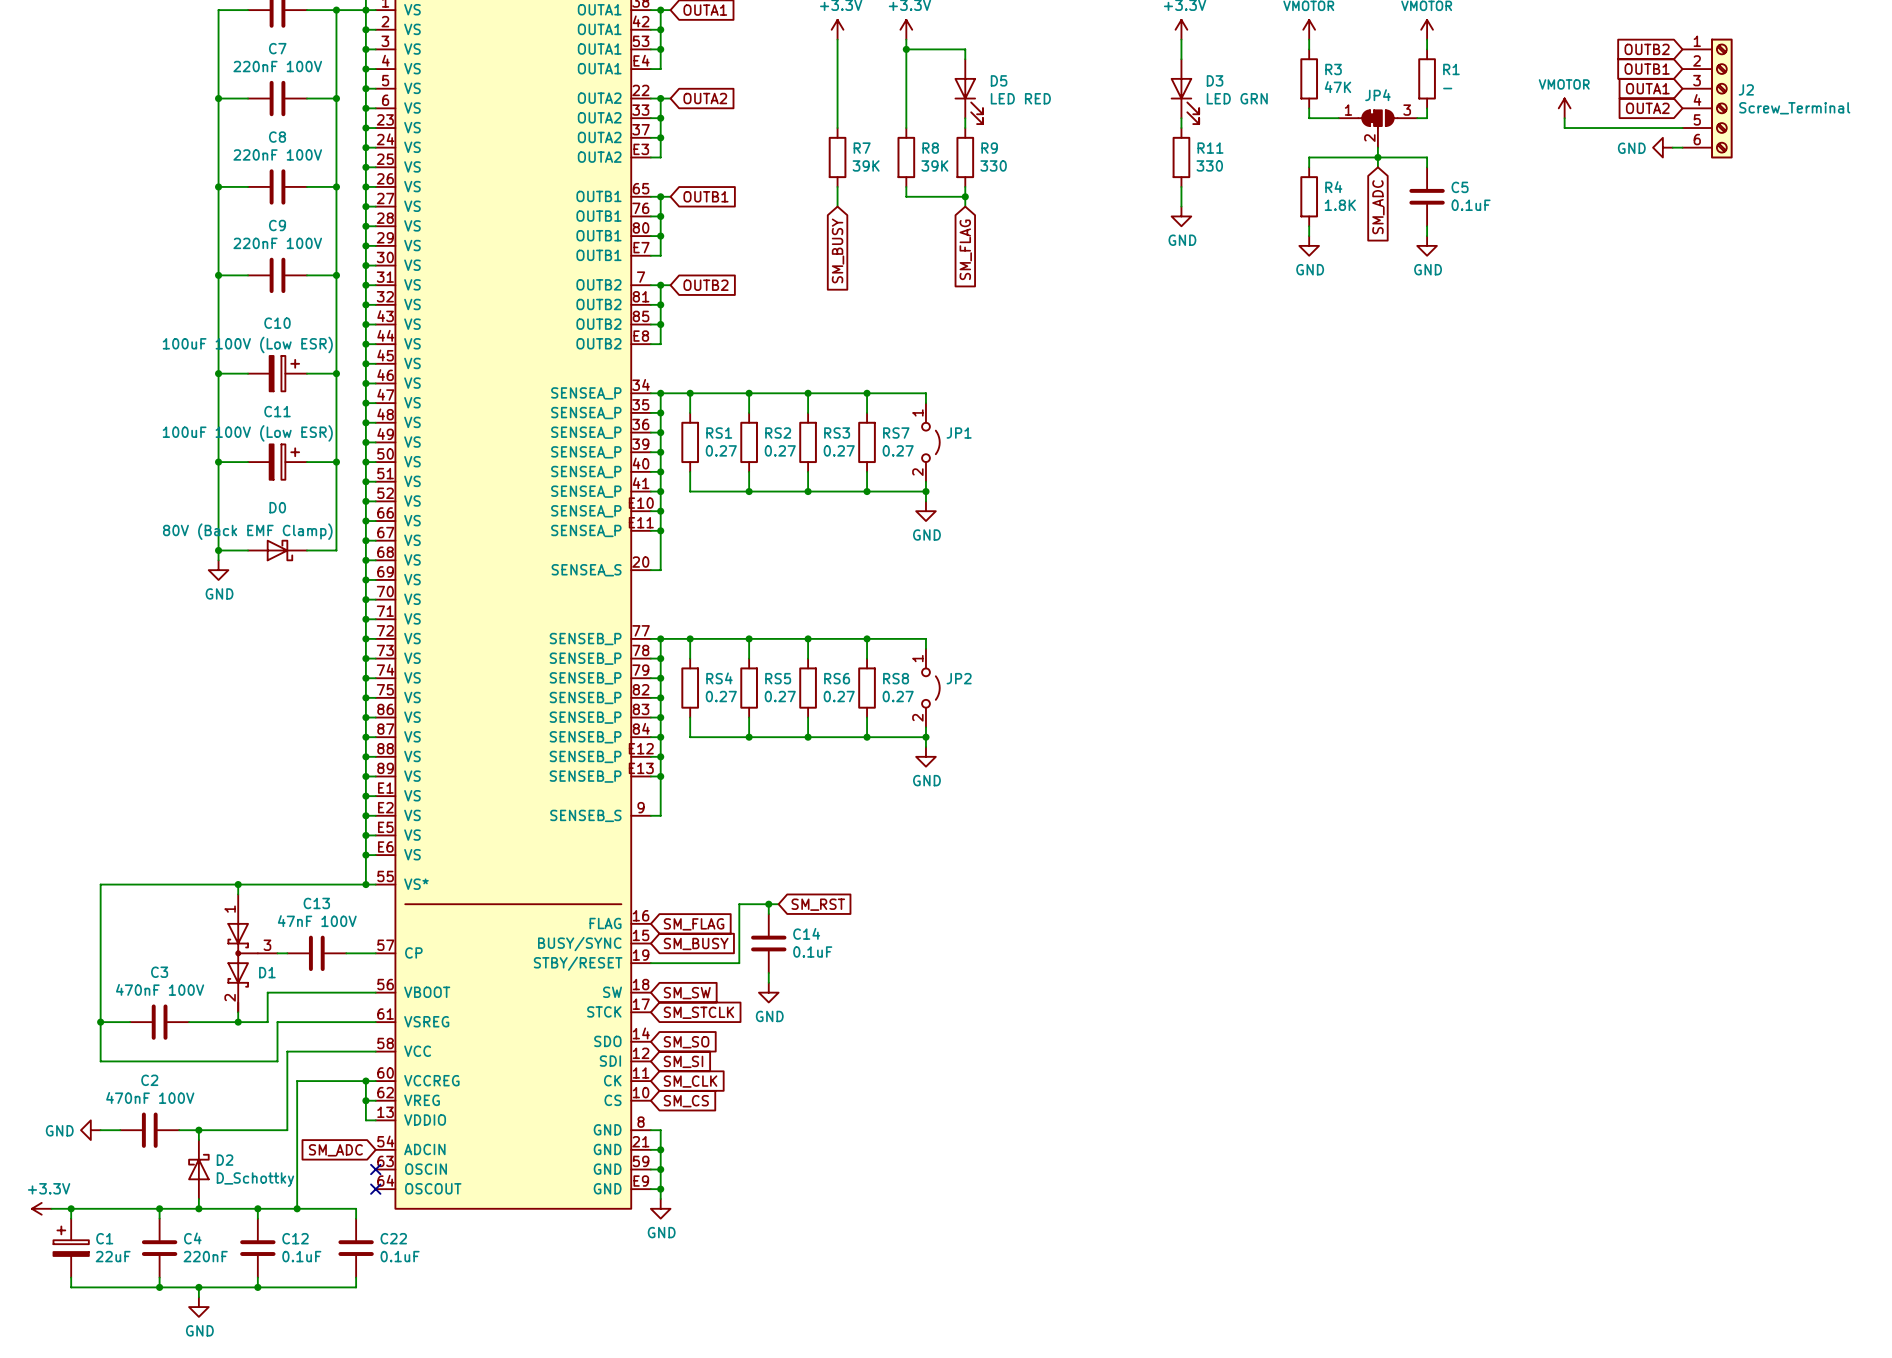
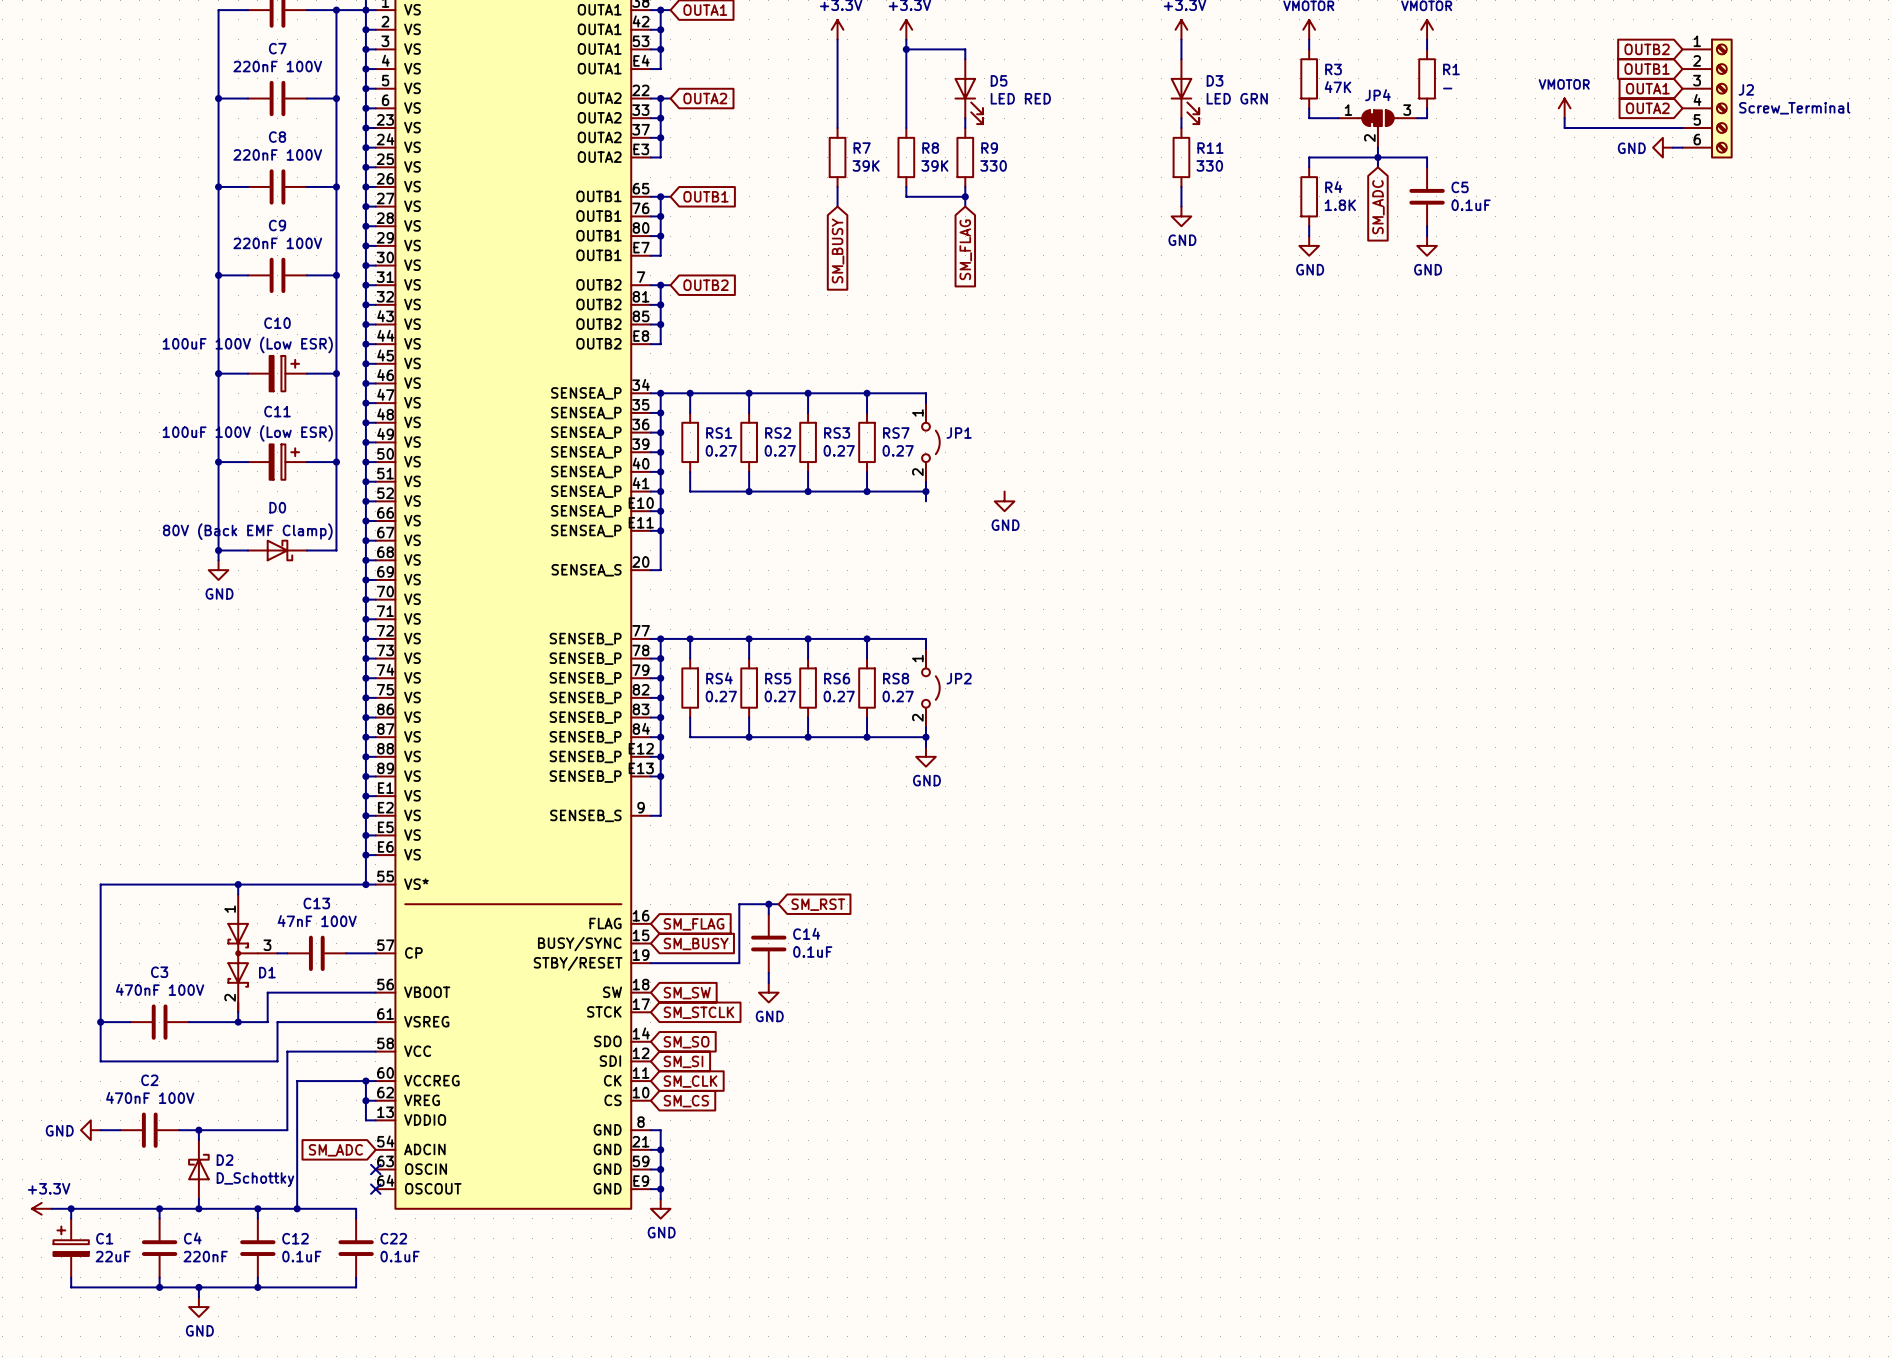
power symbol position: GND (925, 511) -> GND (1004, 501)

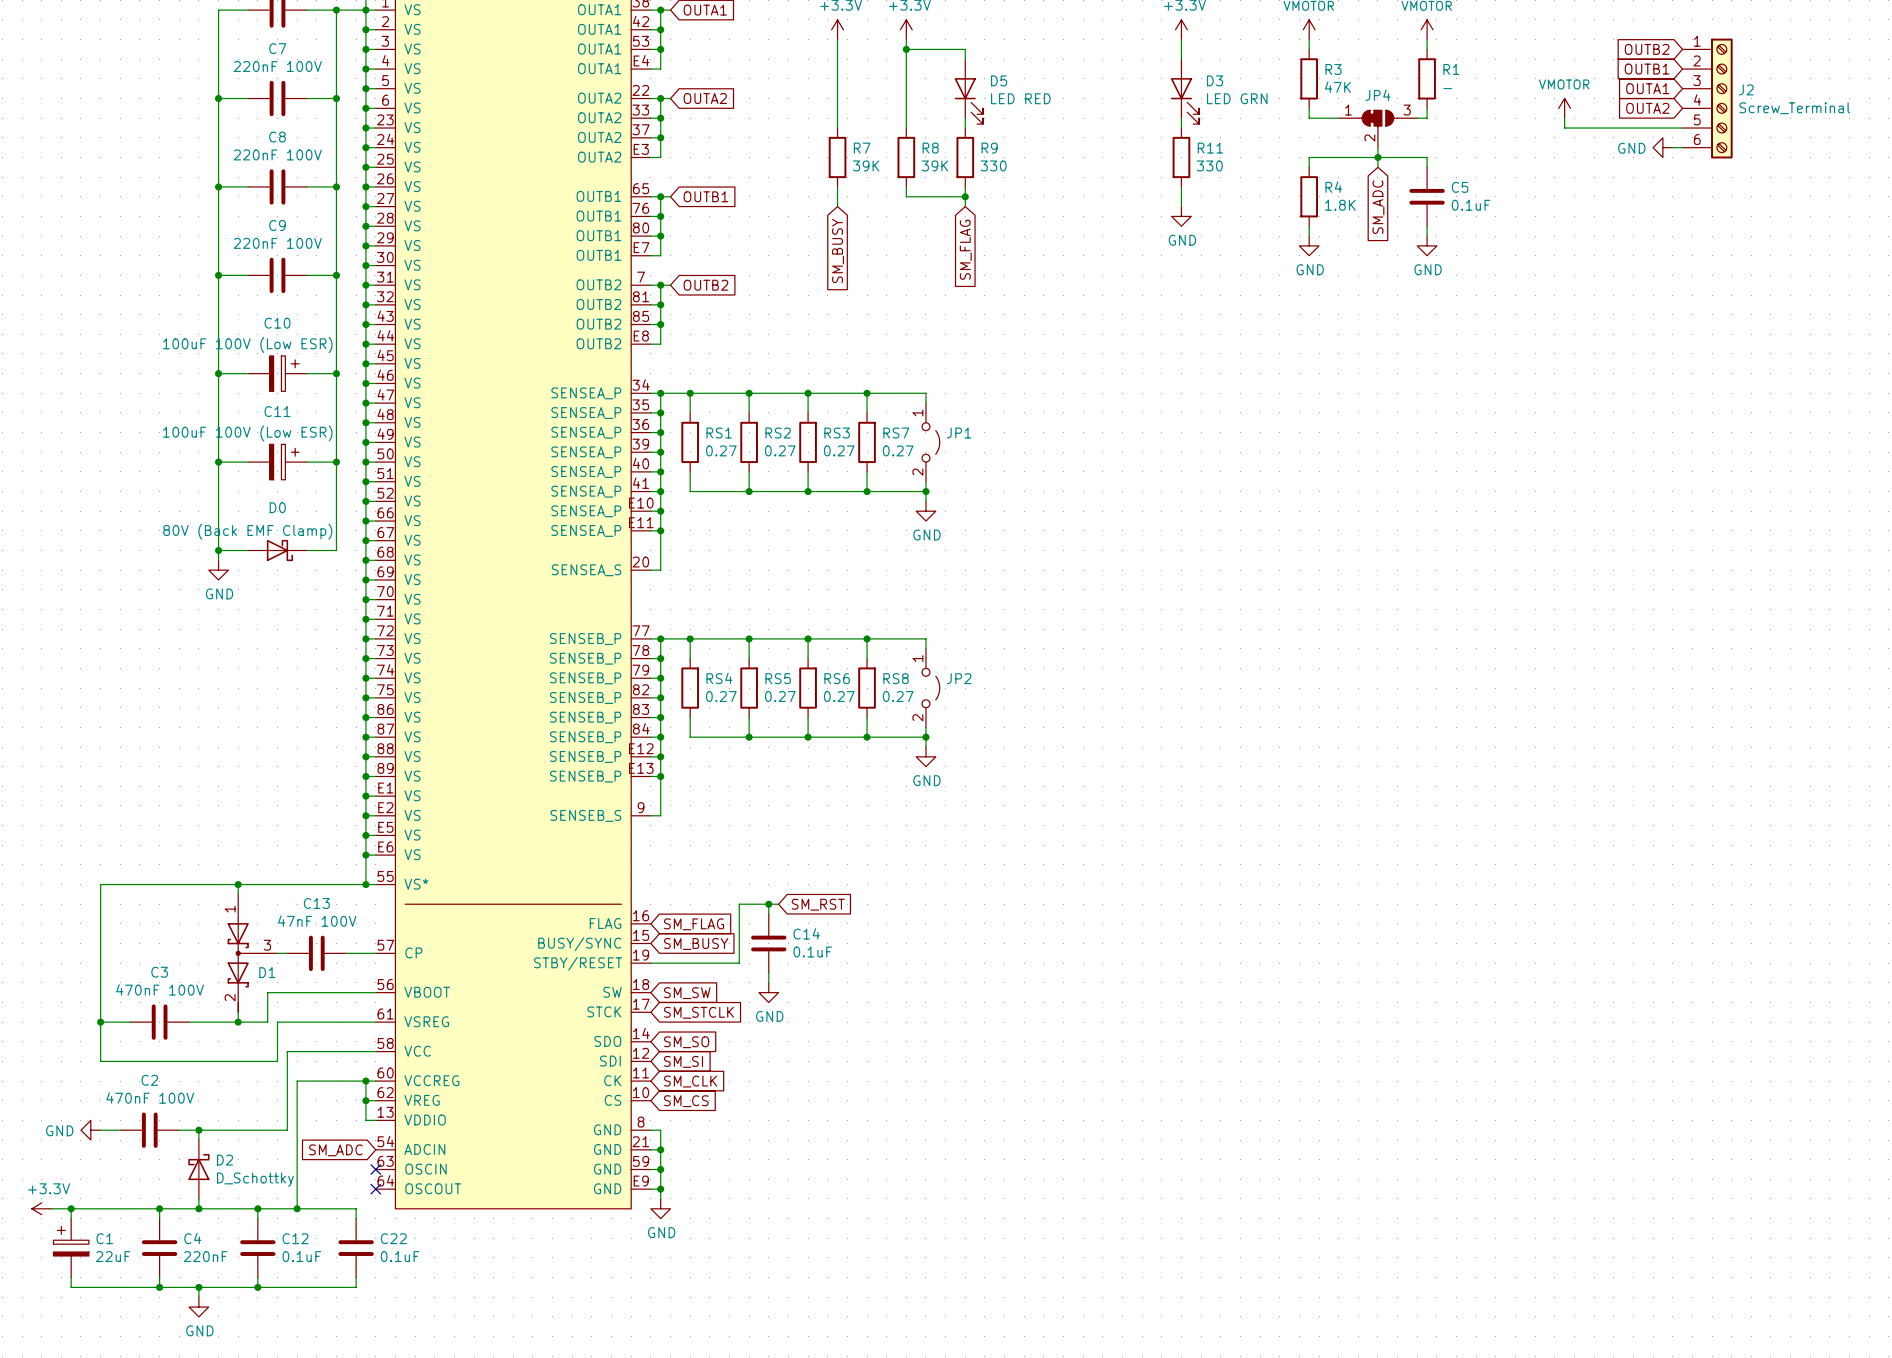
power symbol position: GND (1004, 501) -> GND (925, 511)

